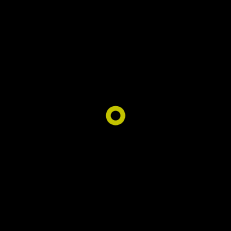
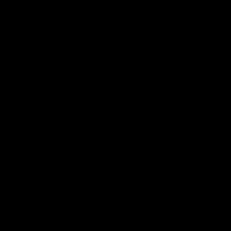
part: (115, 115) -> none

